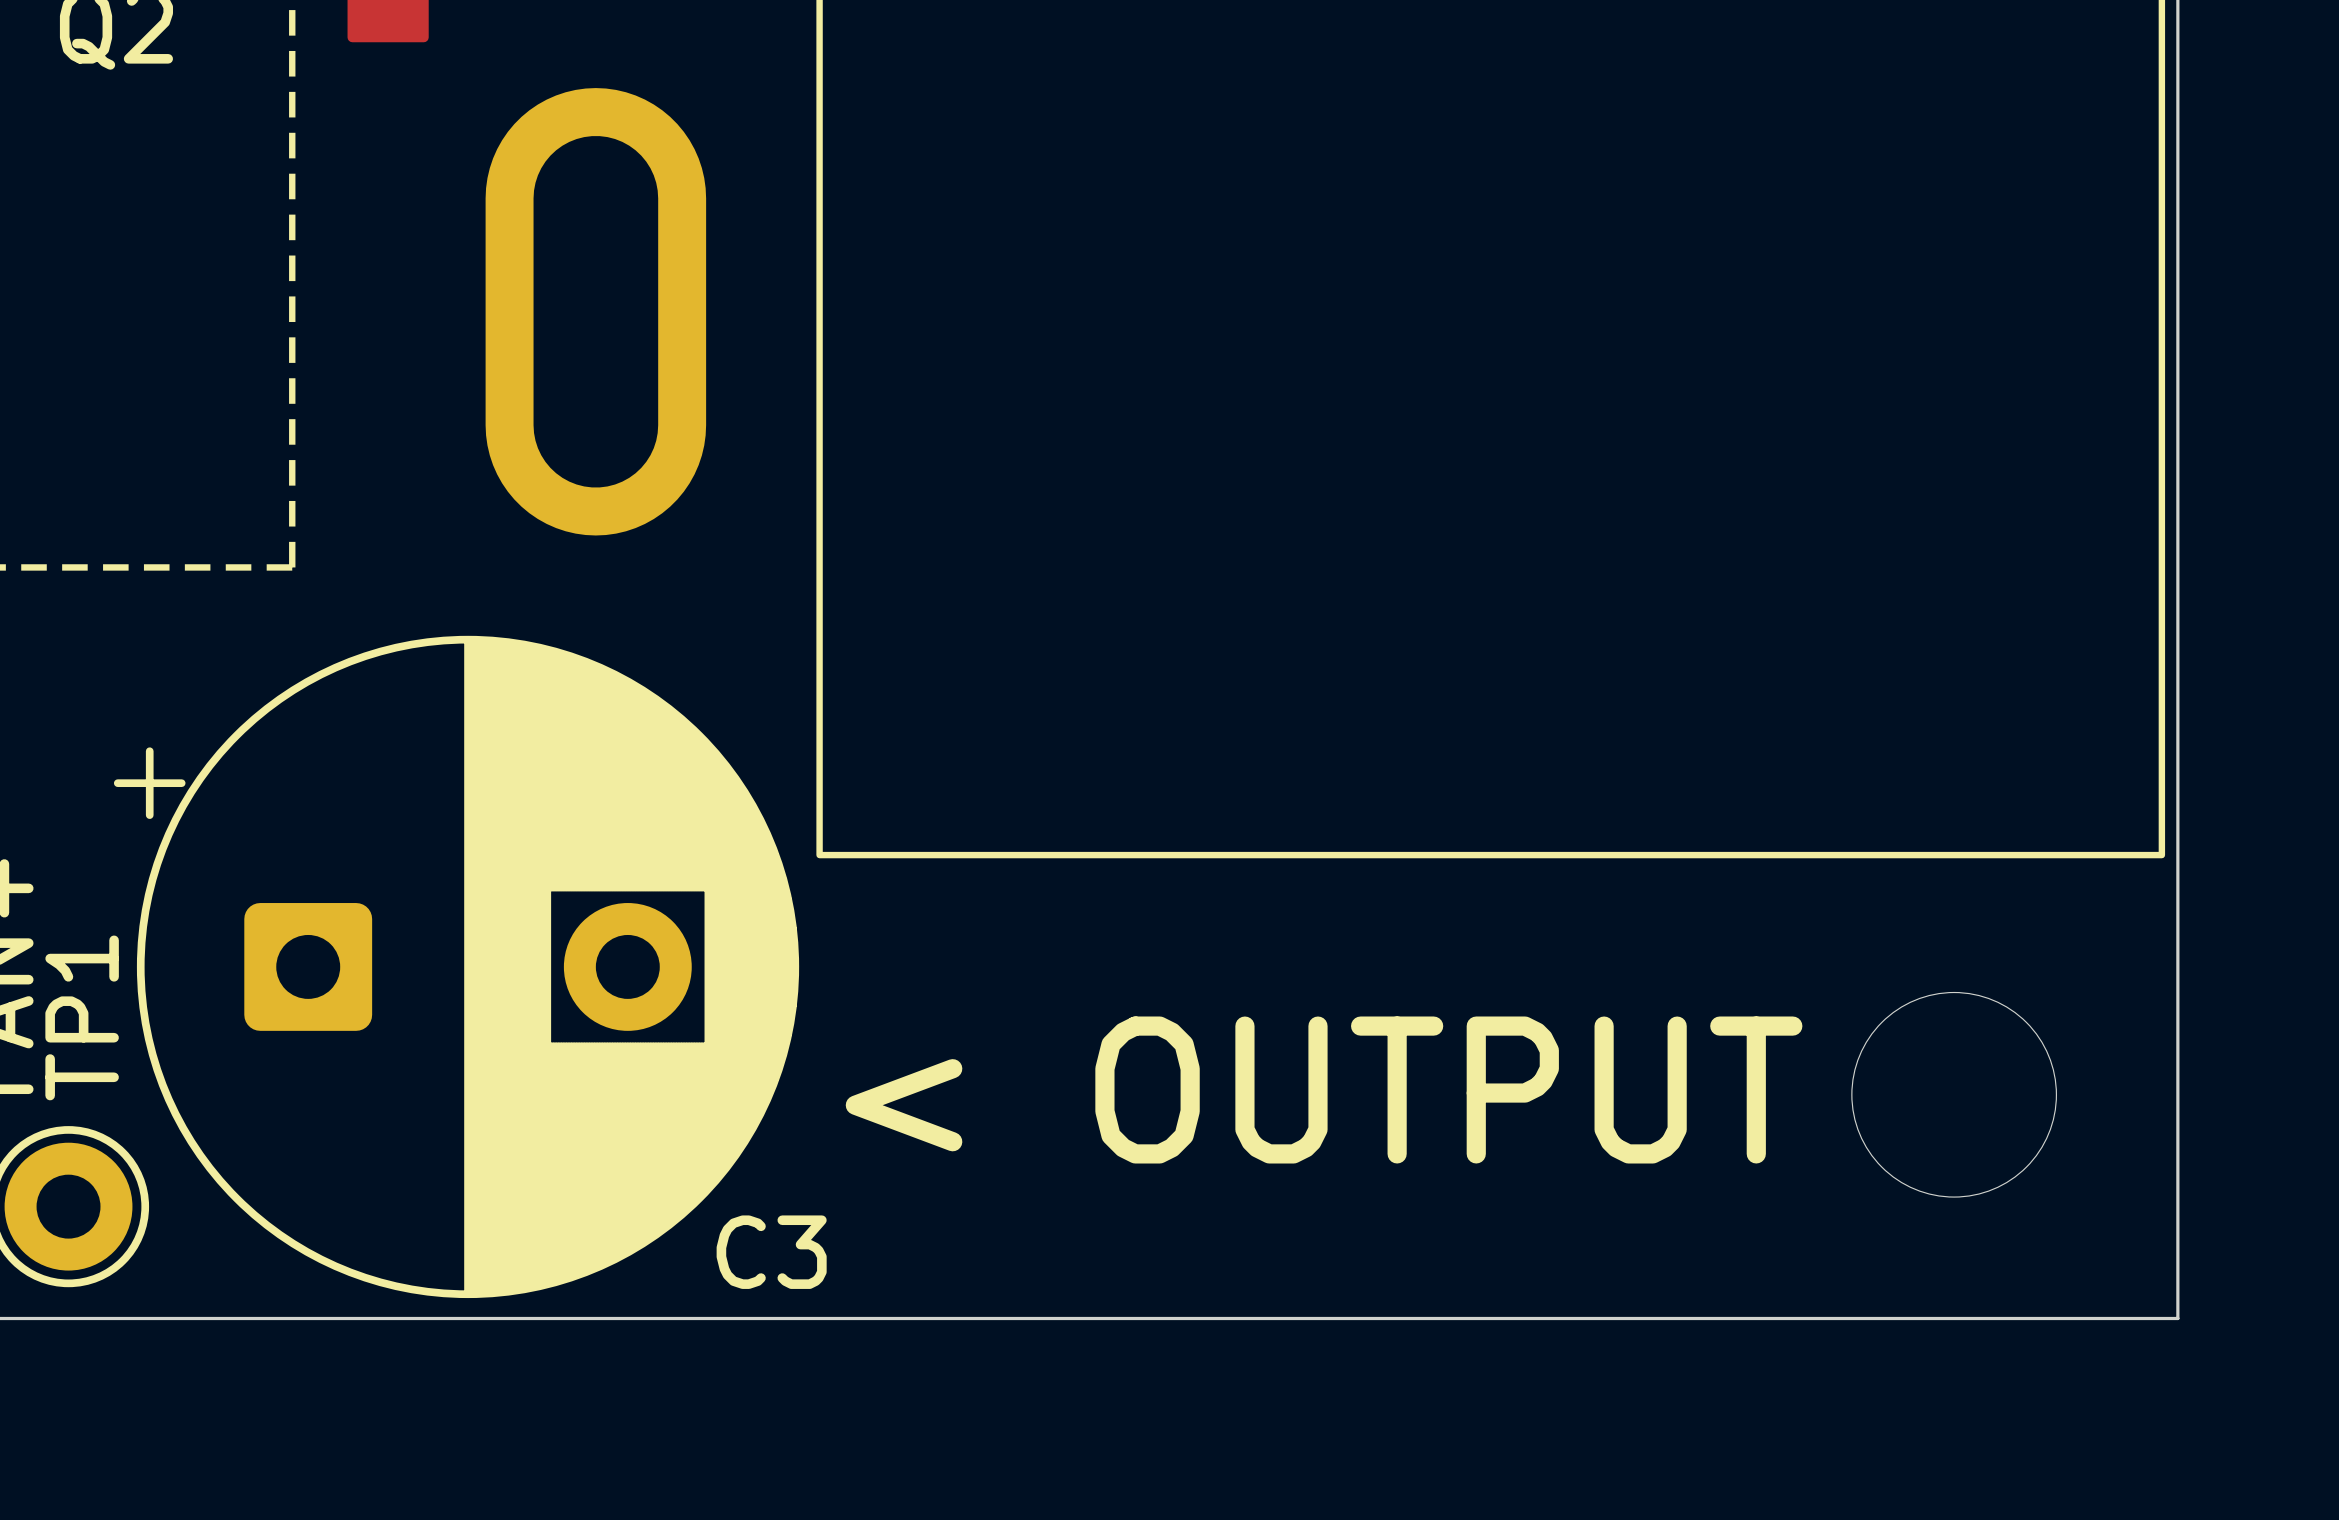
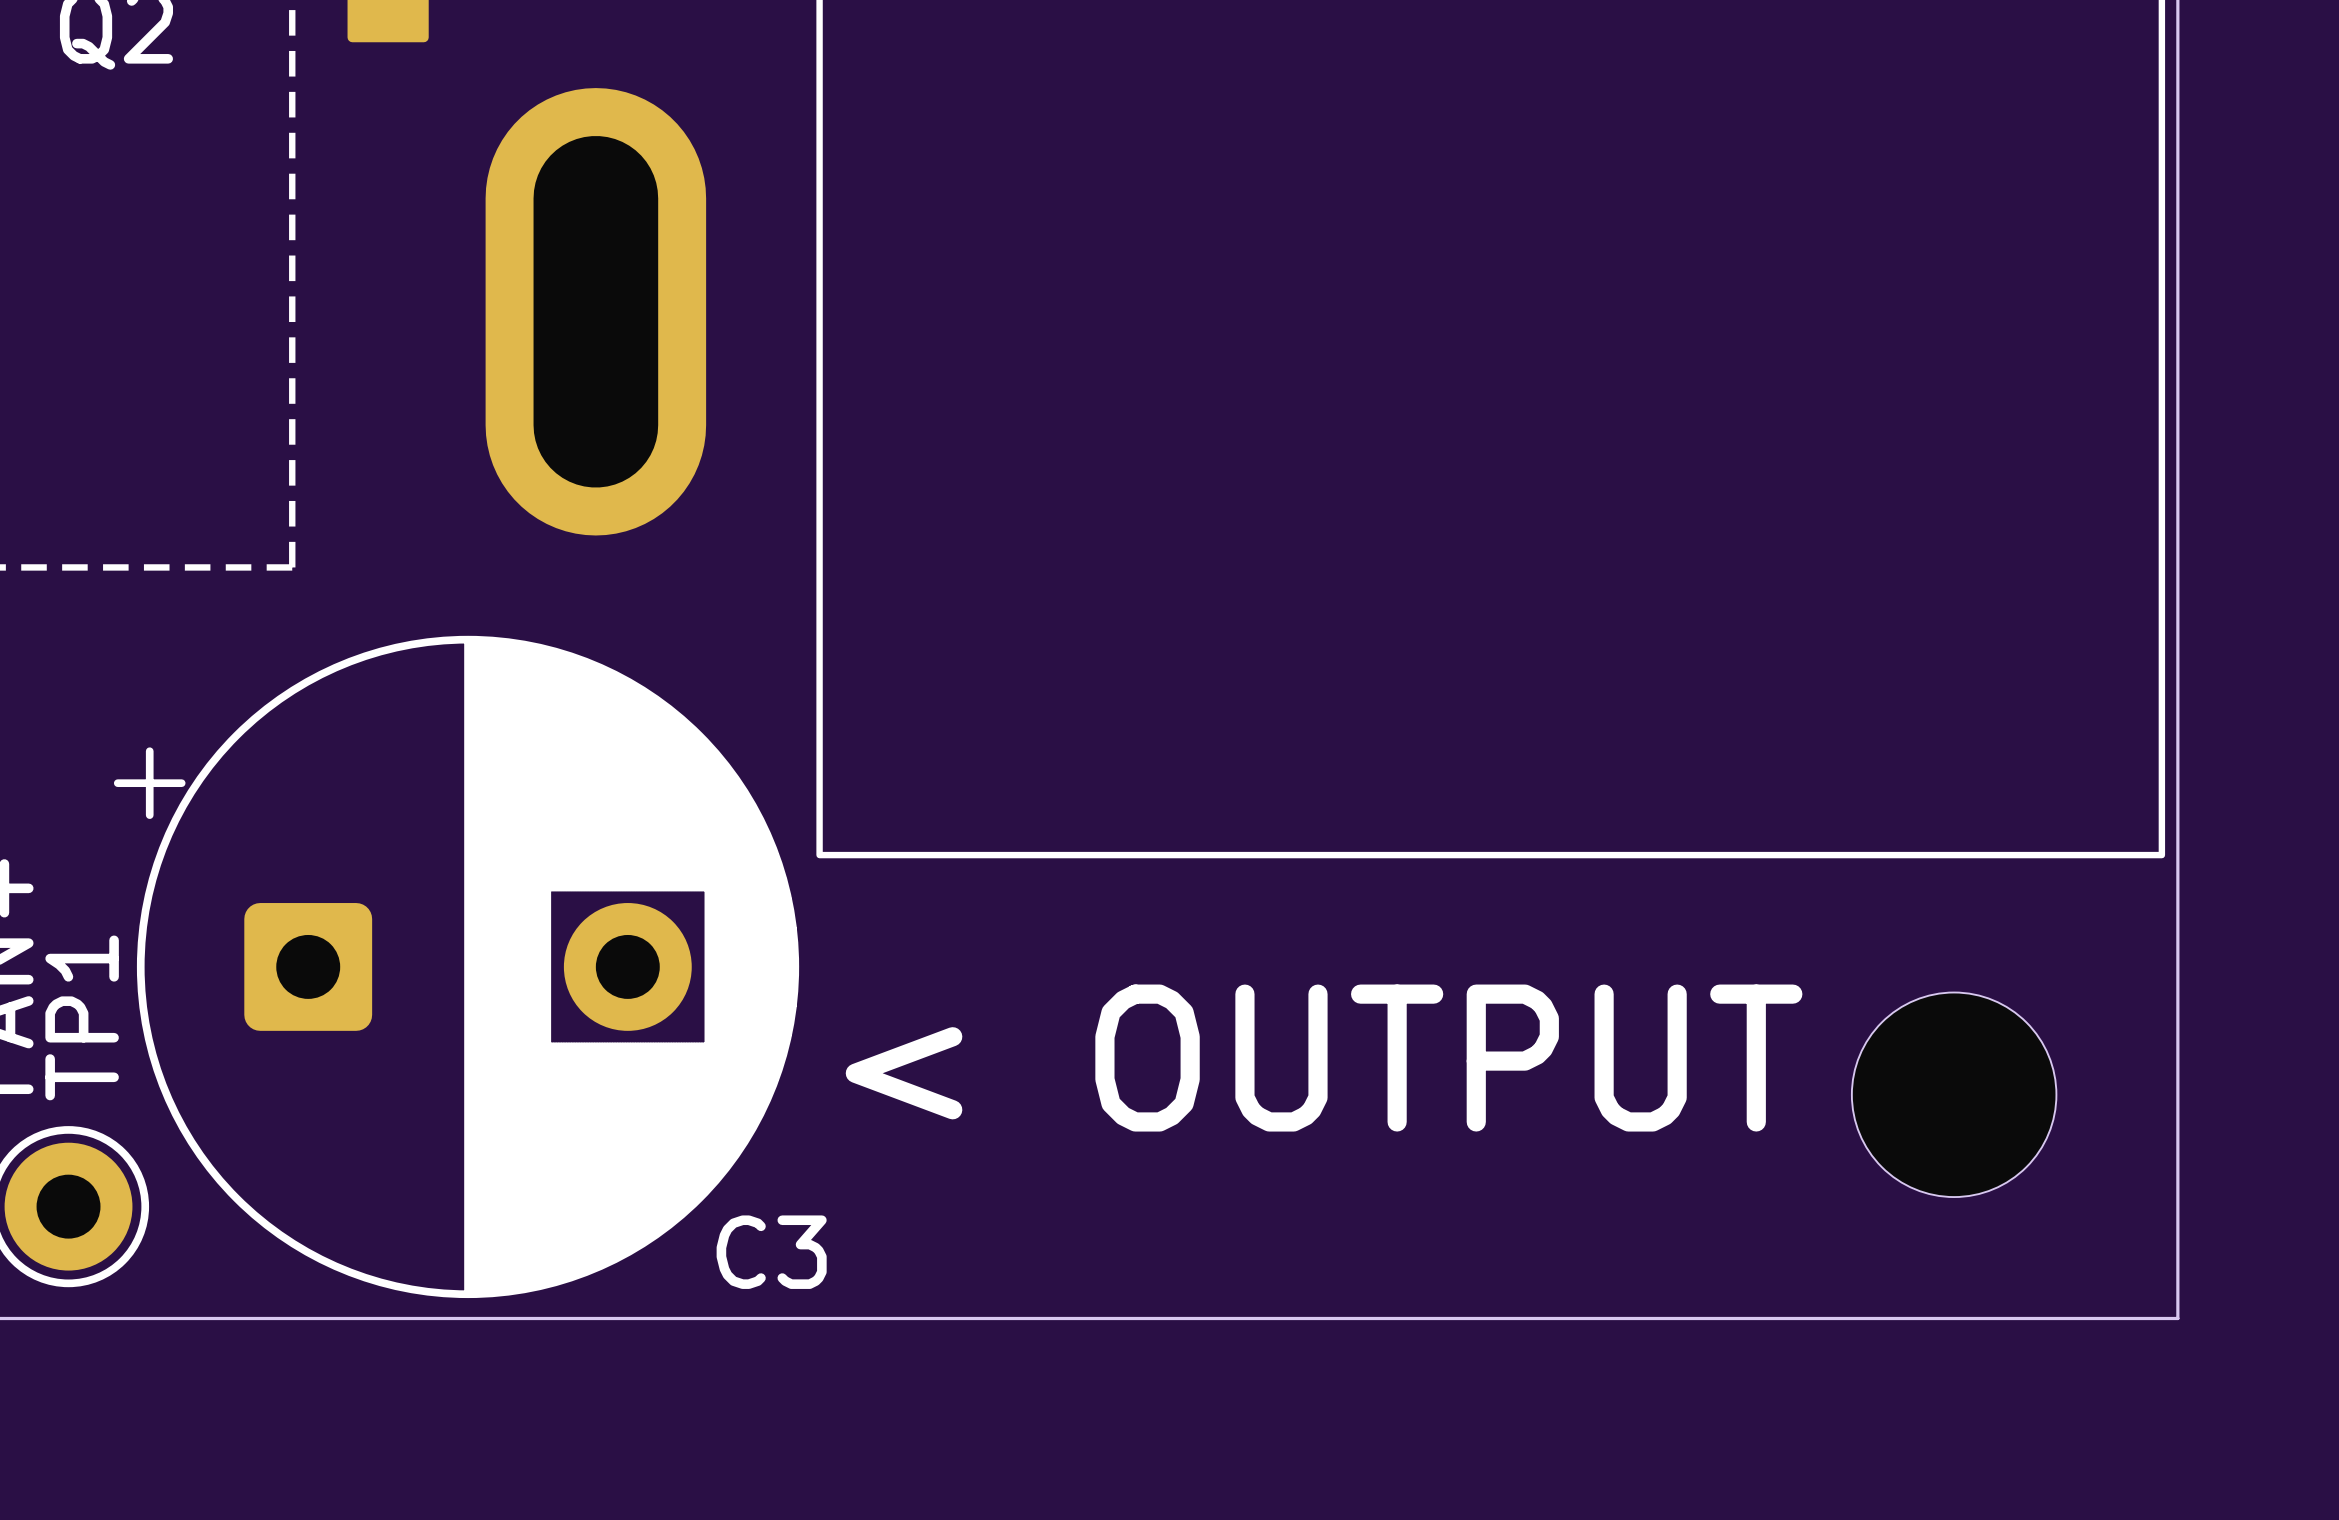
text position: < OUTPUT (1324, 1090) -> < OUTPUT (1324, 1058)

